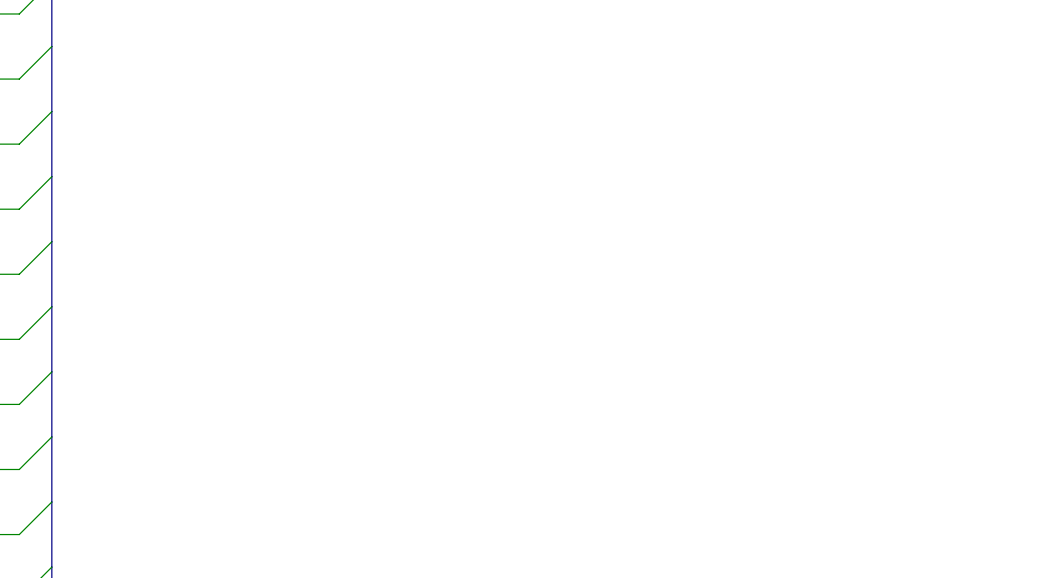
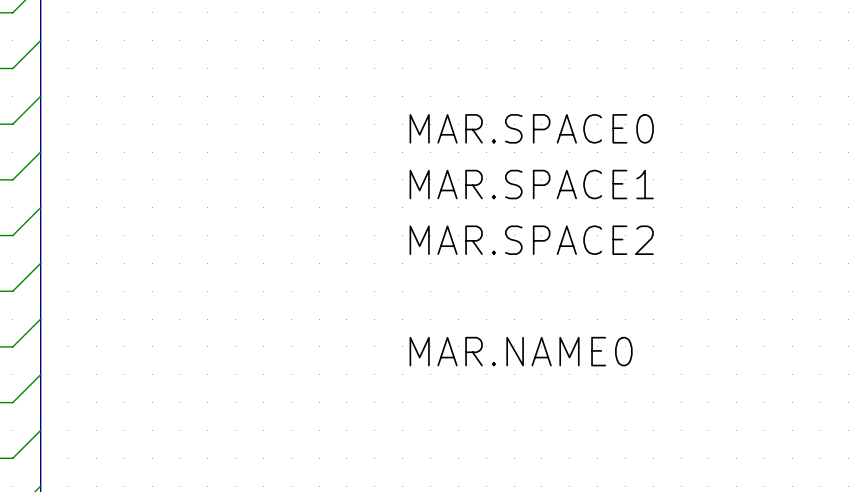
label: none -> MAR.SPACE0 (531, 128)
label: none -> MAR.SPACE1 (531, 184)
label: none -> MAR.SPACE2 (531, 240)
label: none -> MAR.NAME0 (521, 351)

